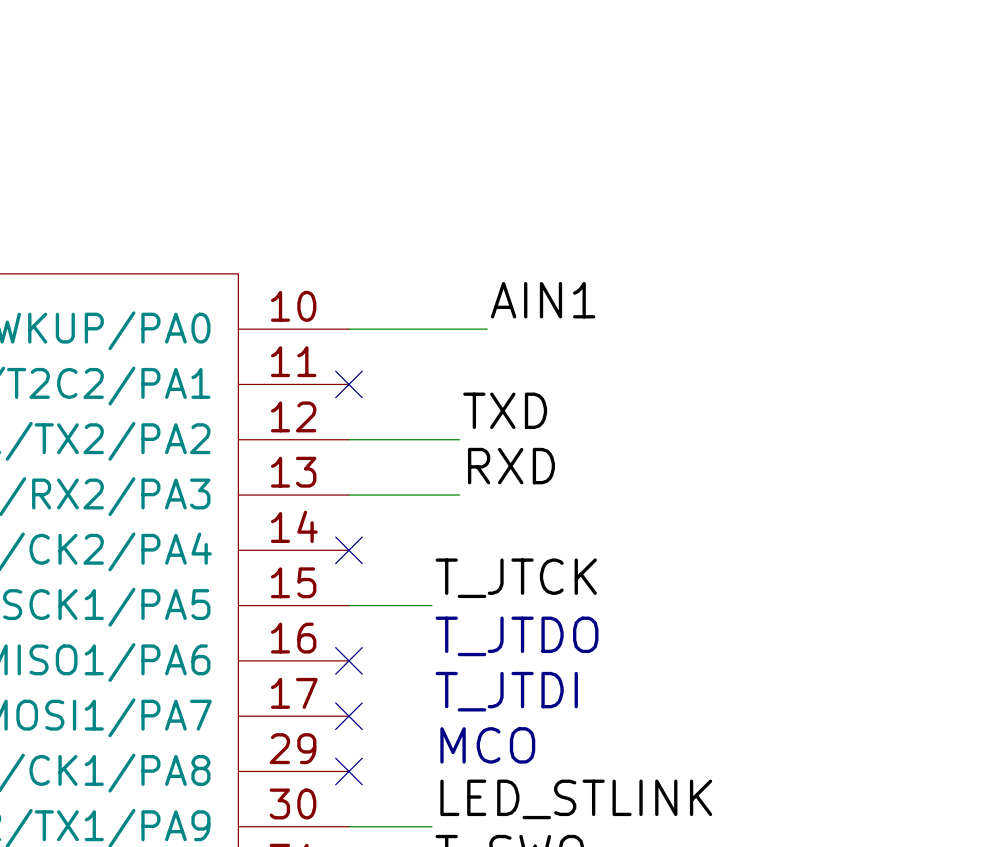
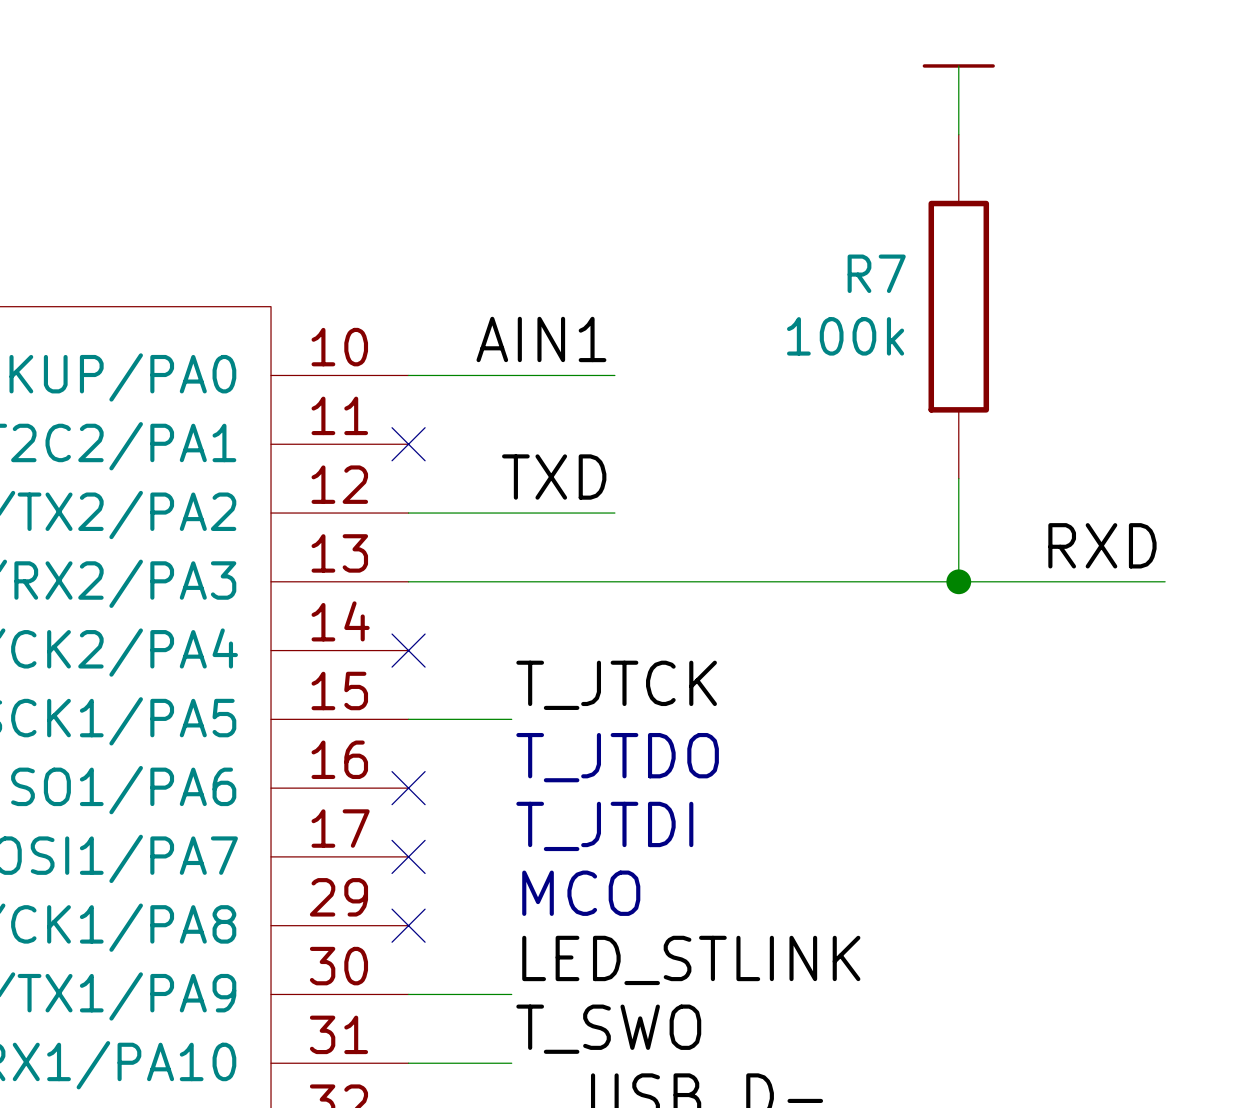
wire: none -> (958, 65) (958, 134)
power symbol: none -> (958, 65)
R7: none -> 100k (958, 306)
label position: AIN1 (543, 300) -> AIN1 (541, 339)
wire: none -> (580, 375) (614, 375)
label position: TXD (505, 410) -> TXD (554, 477)
wire: none -> (958, 478) (958, 581)
wire: none -> (546, 513) (614, 513)
label position: RXD (511, 466) -> RXD (1102, 545)
wire: none -> (546, 581) (1165, 581)
junction: none -> (958, 581)

